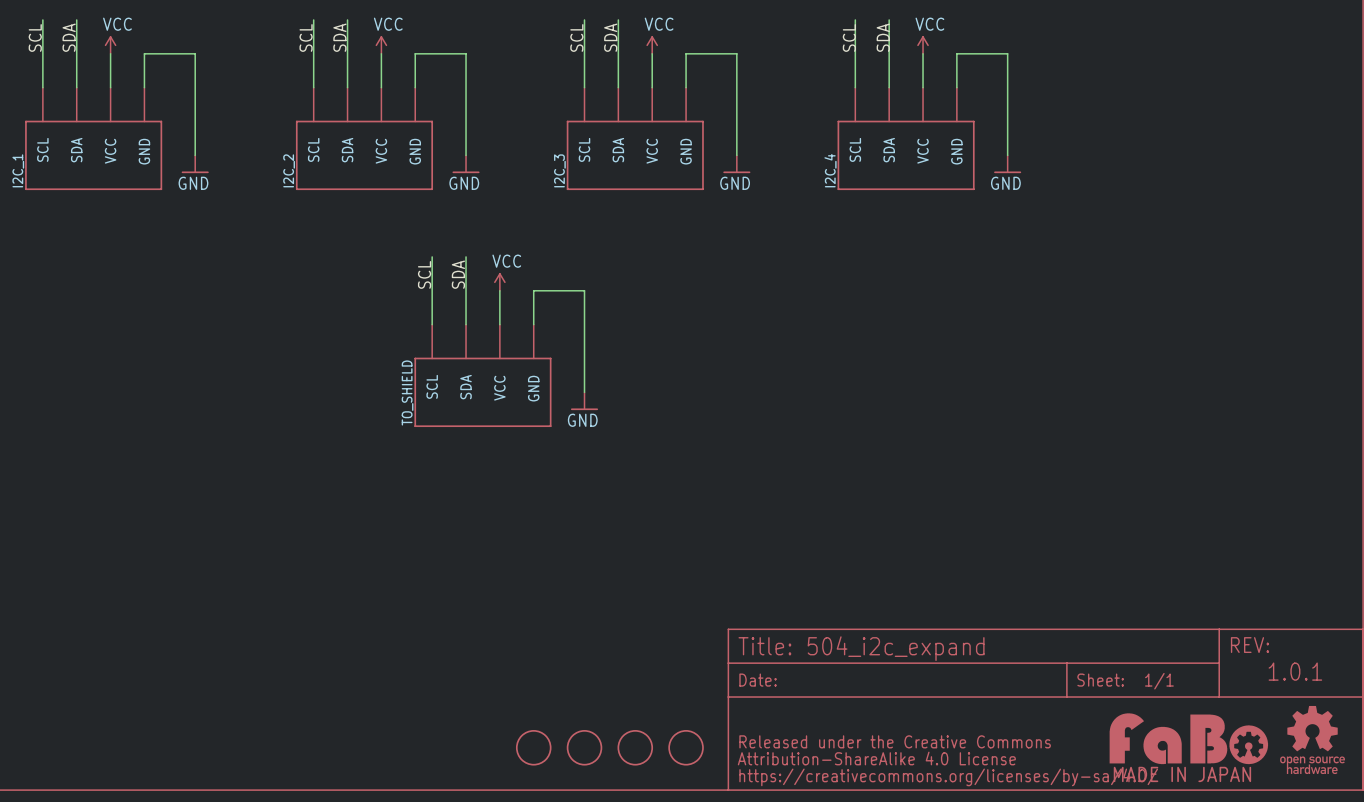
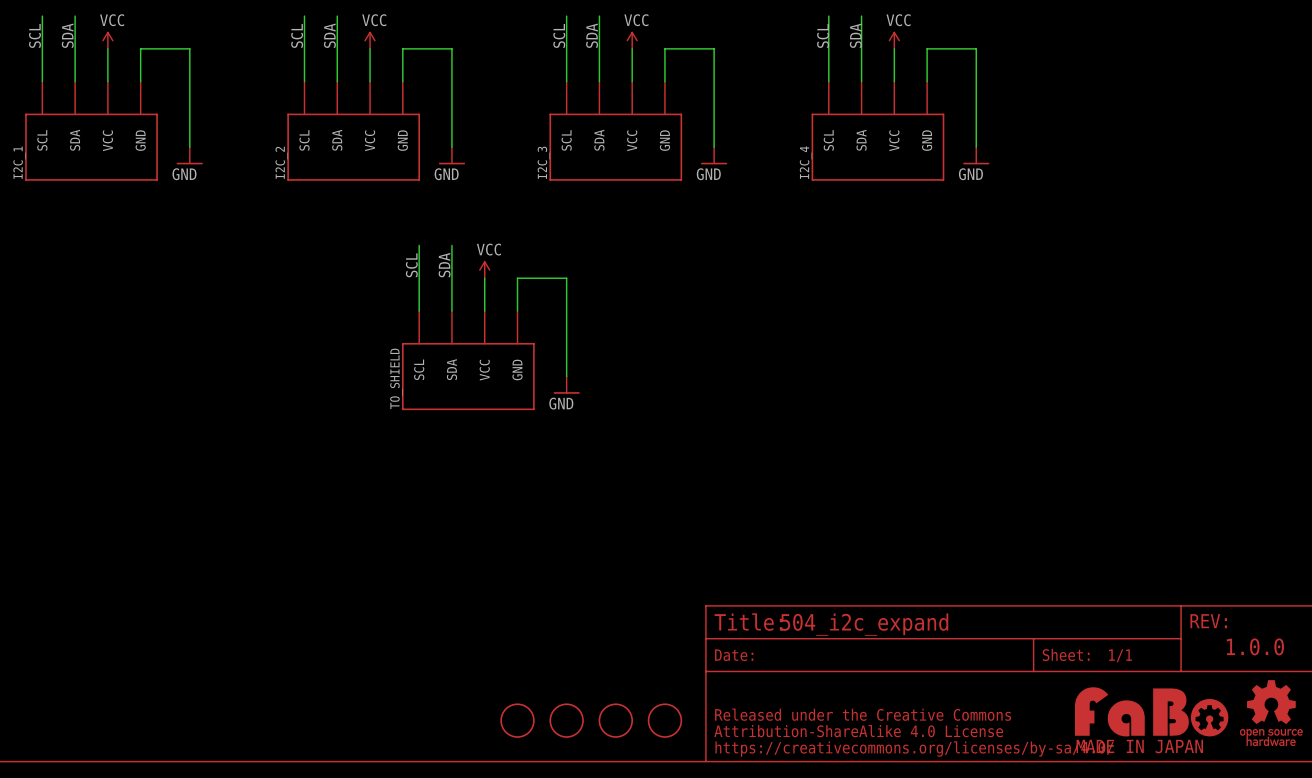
text: 1.0.1 (1295, 671) -> 1.0.0 (1255, 646)

